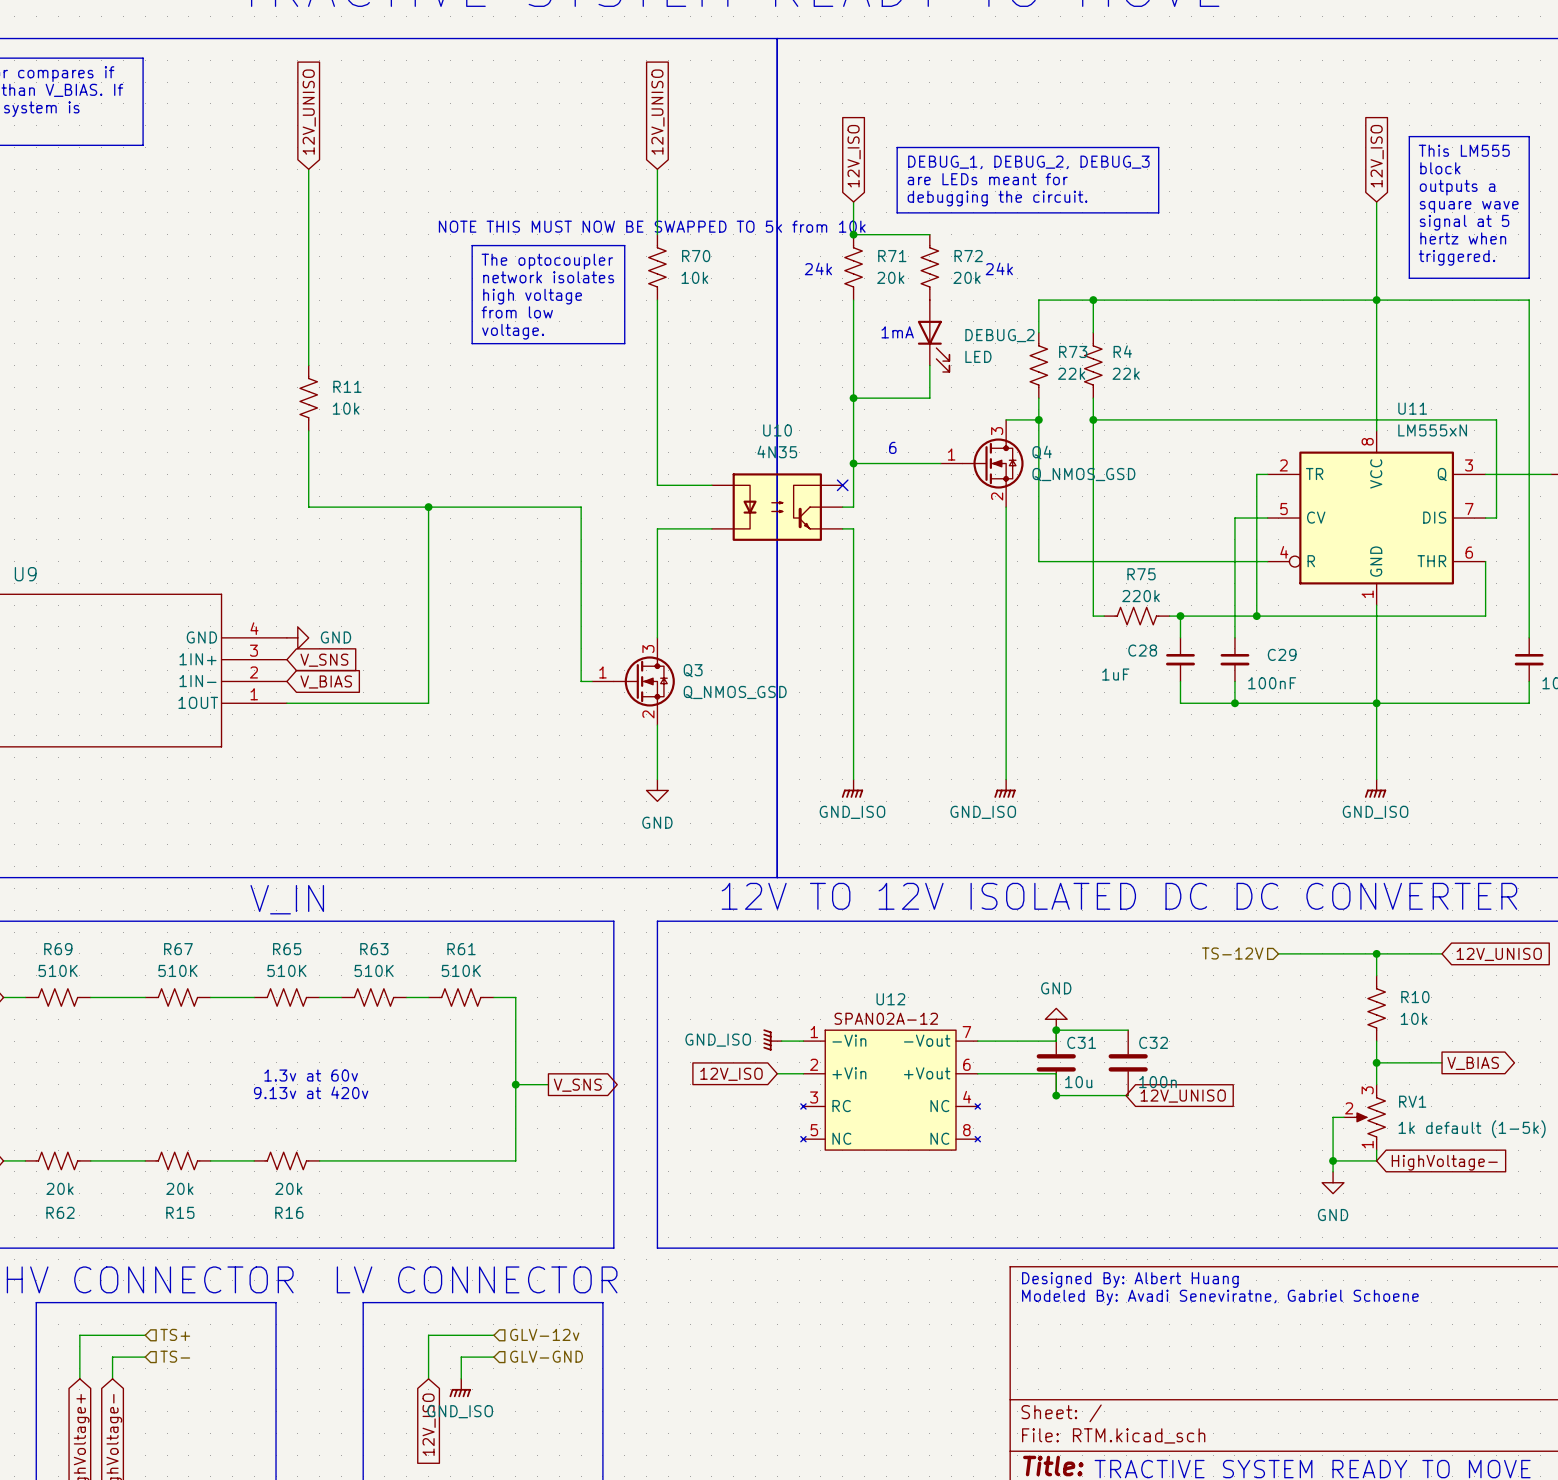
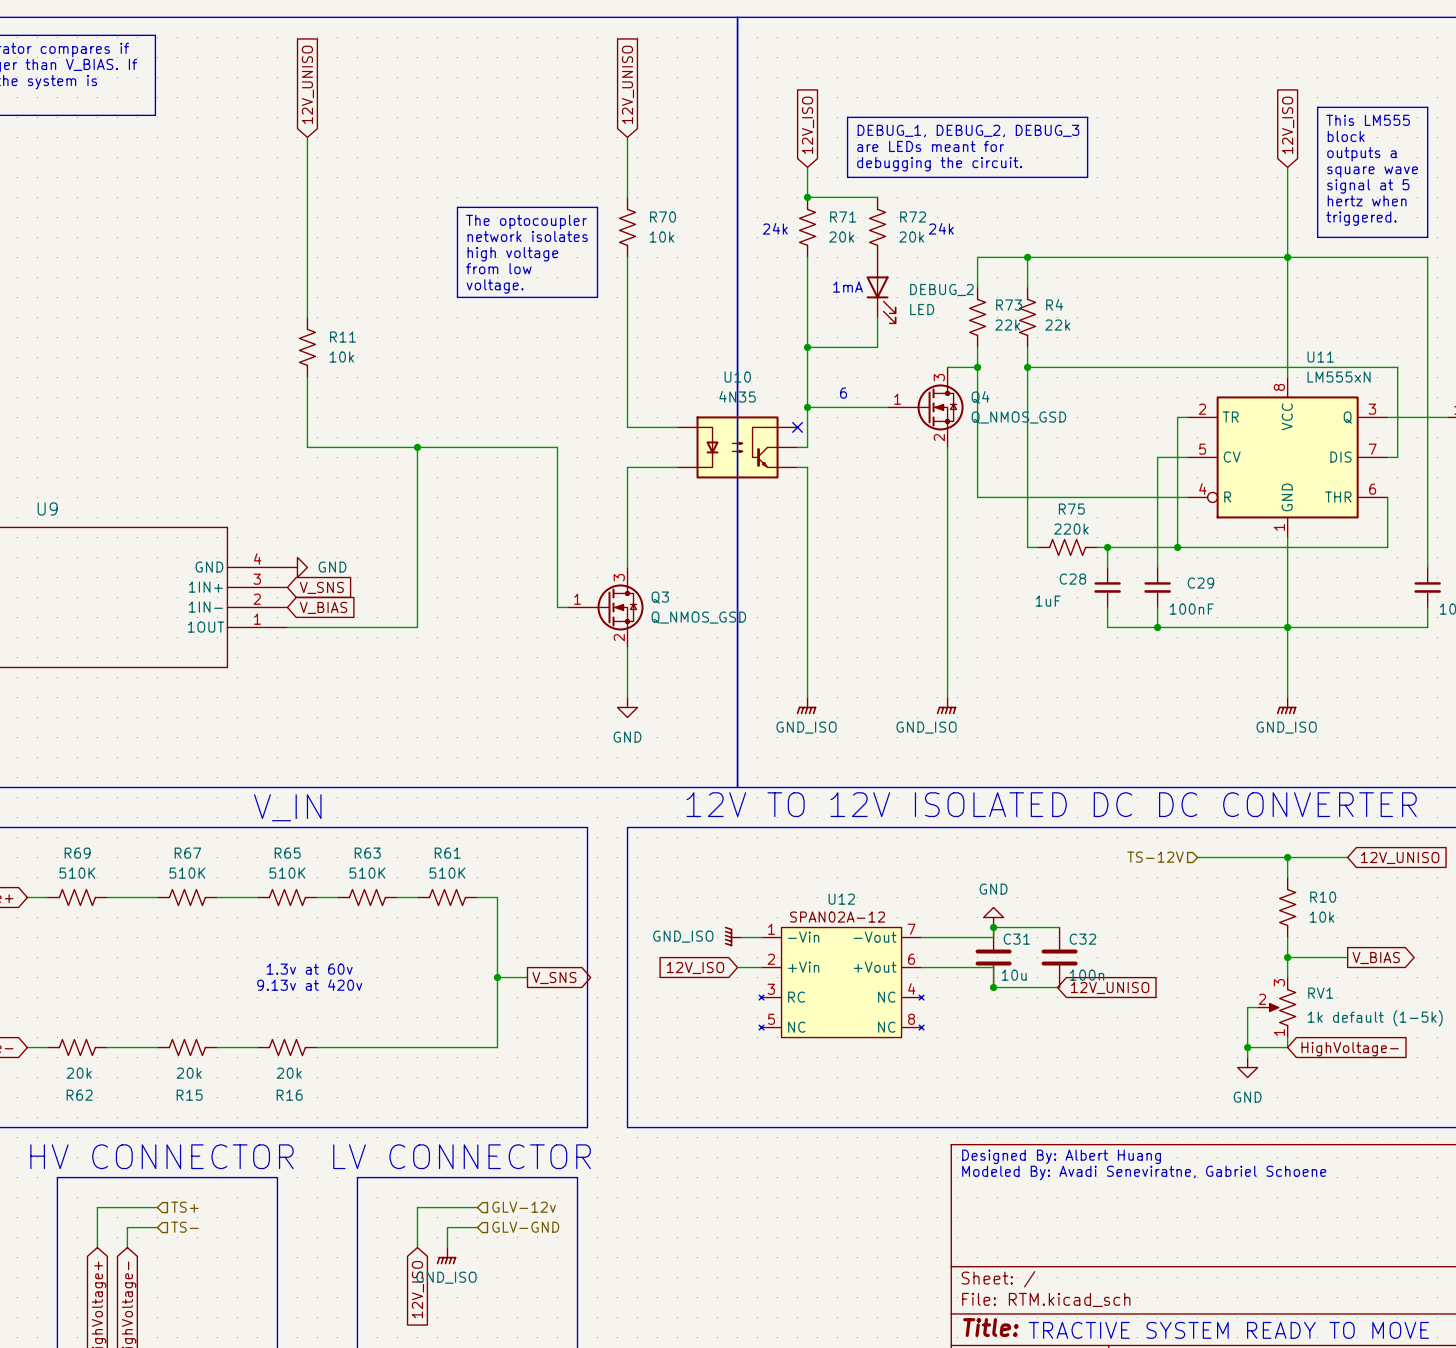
text: NOTE THIS MUST NOW BE SWAPPED TO 5k from 10k (652, 226) -> none

